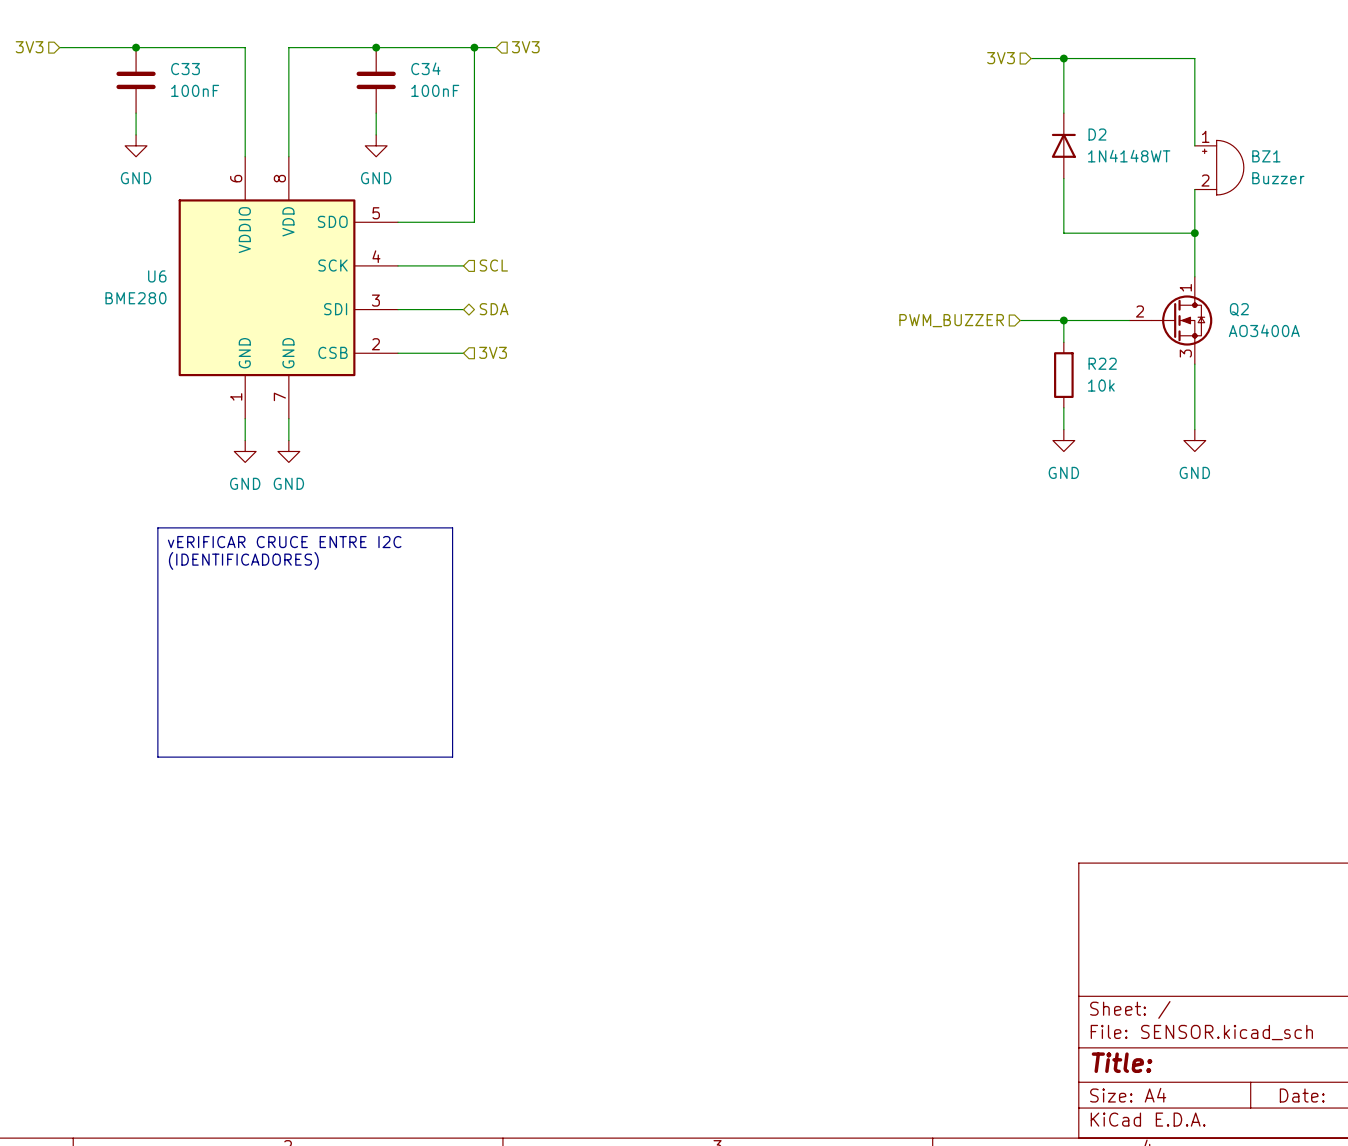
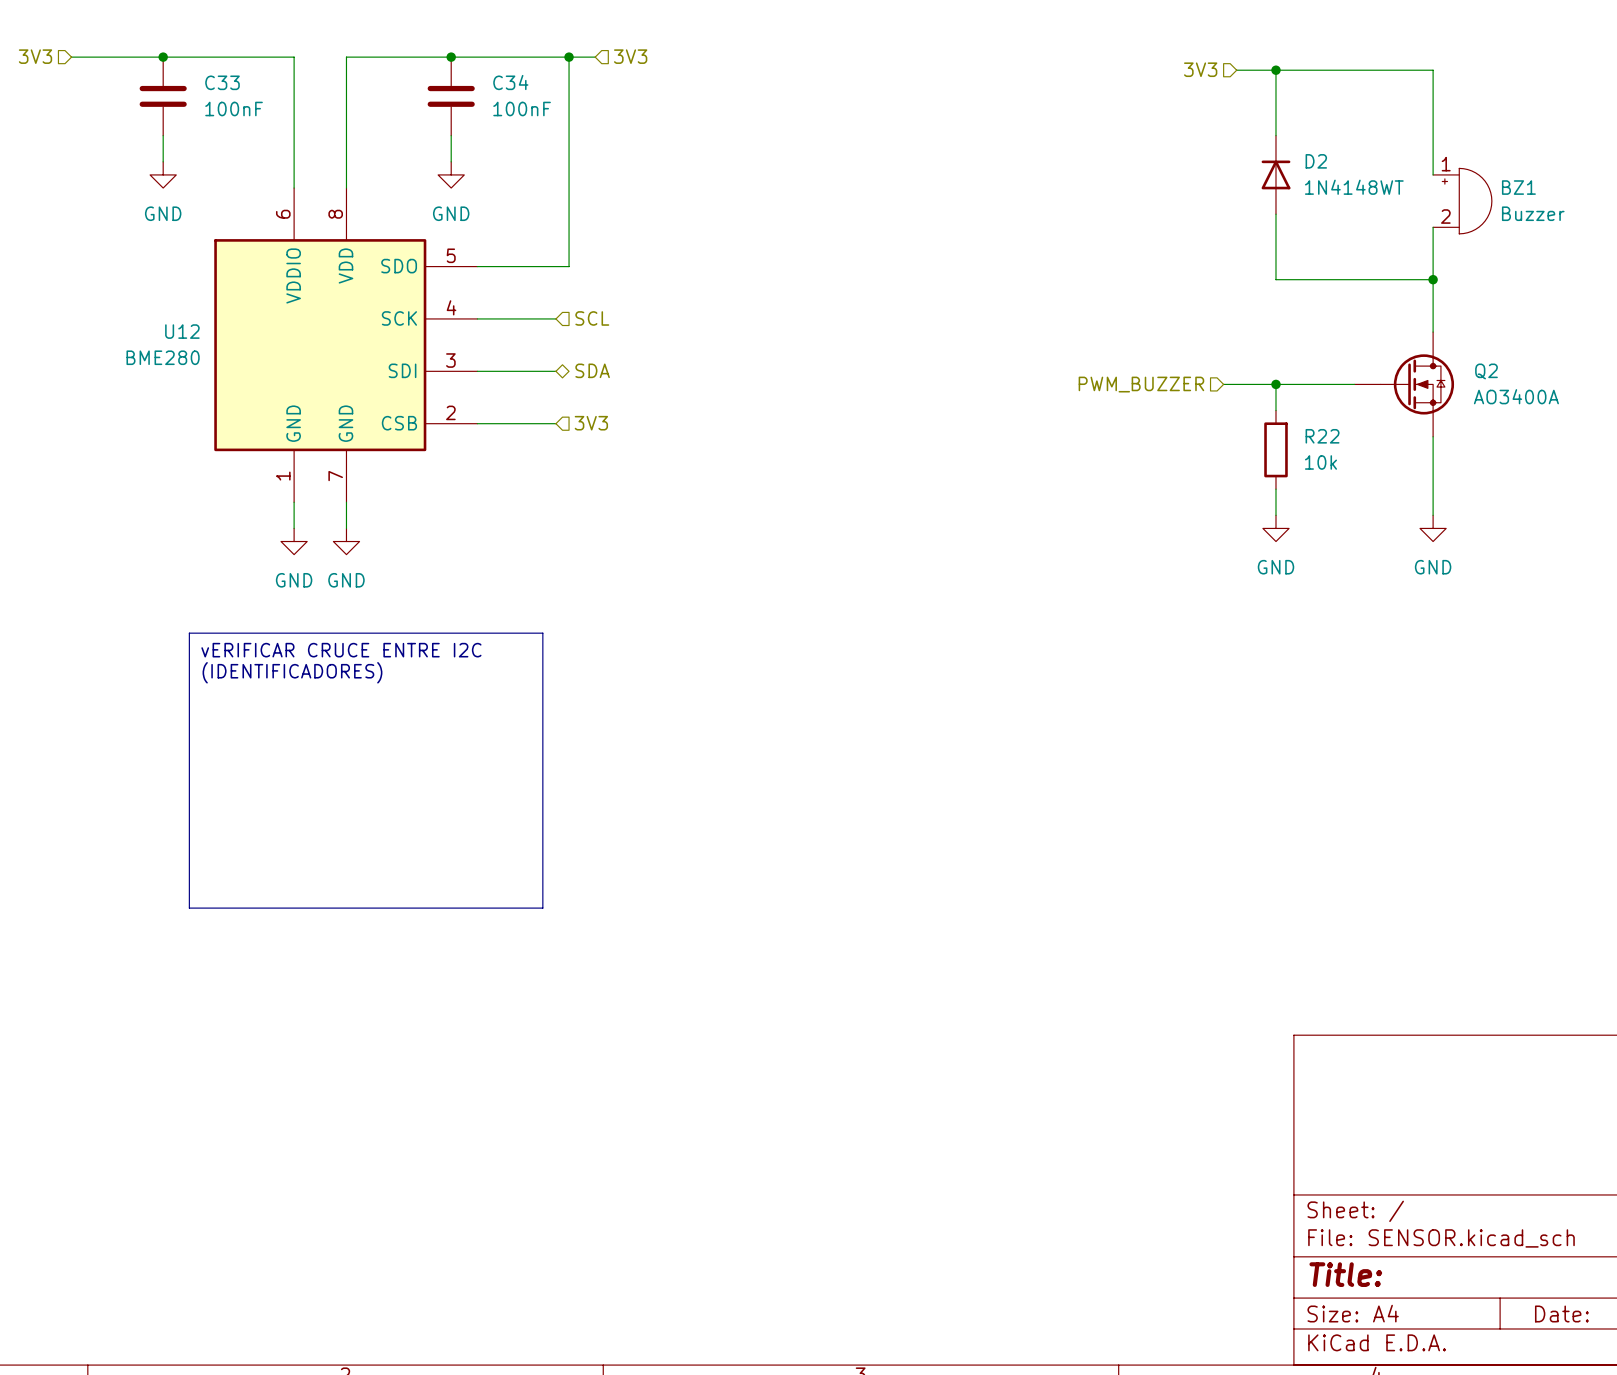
U6 name: U6 (157, 276) -> U12 (182, 331)
Q2 pin number: 1 (1185, 287) -> none
Q2 pin number: 2 (1139, 311) -> none
Q2 pin number: 3 (1185, 353) -> none

